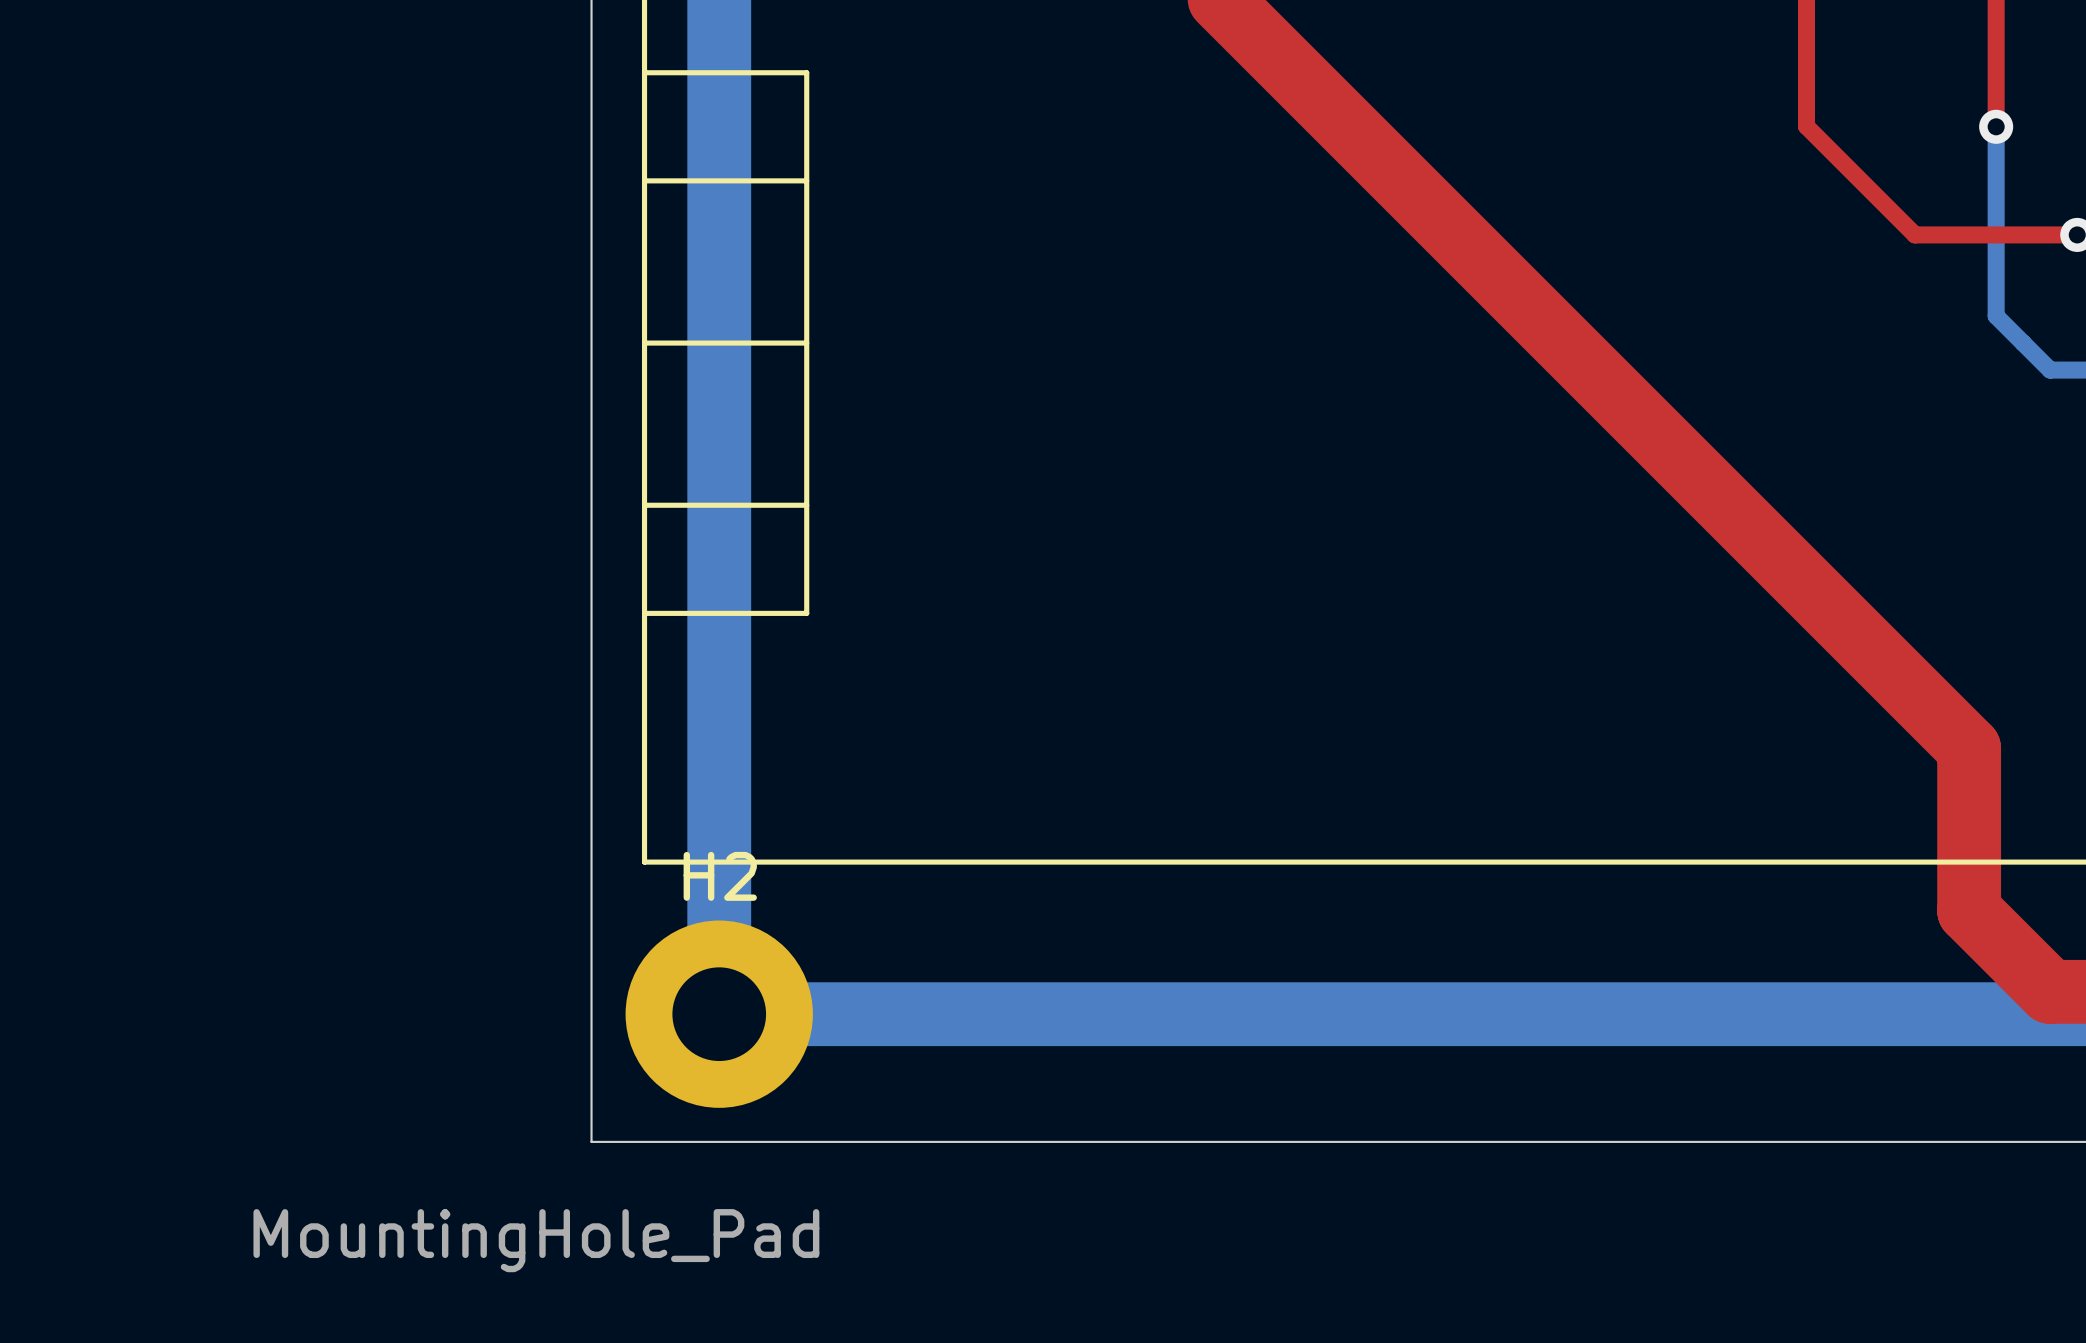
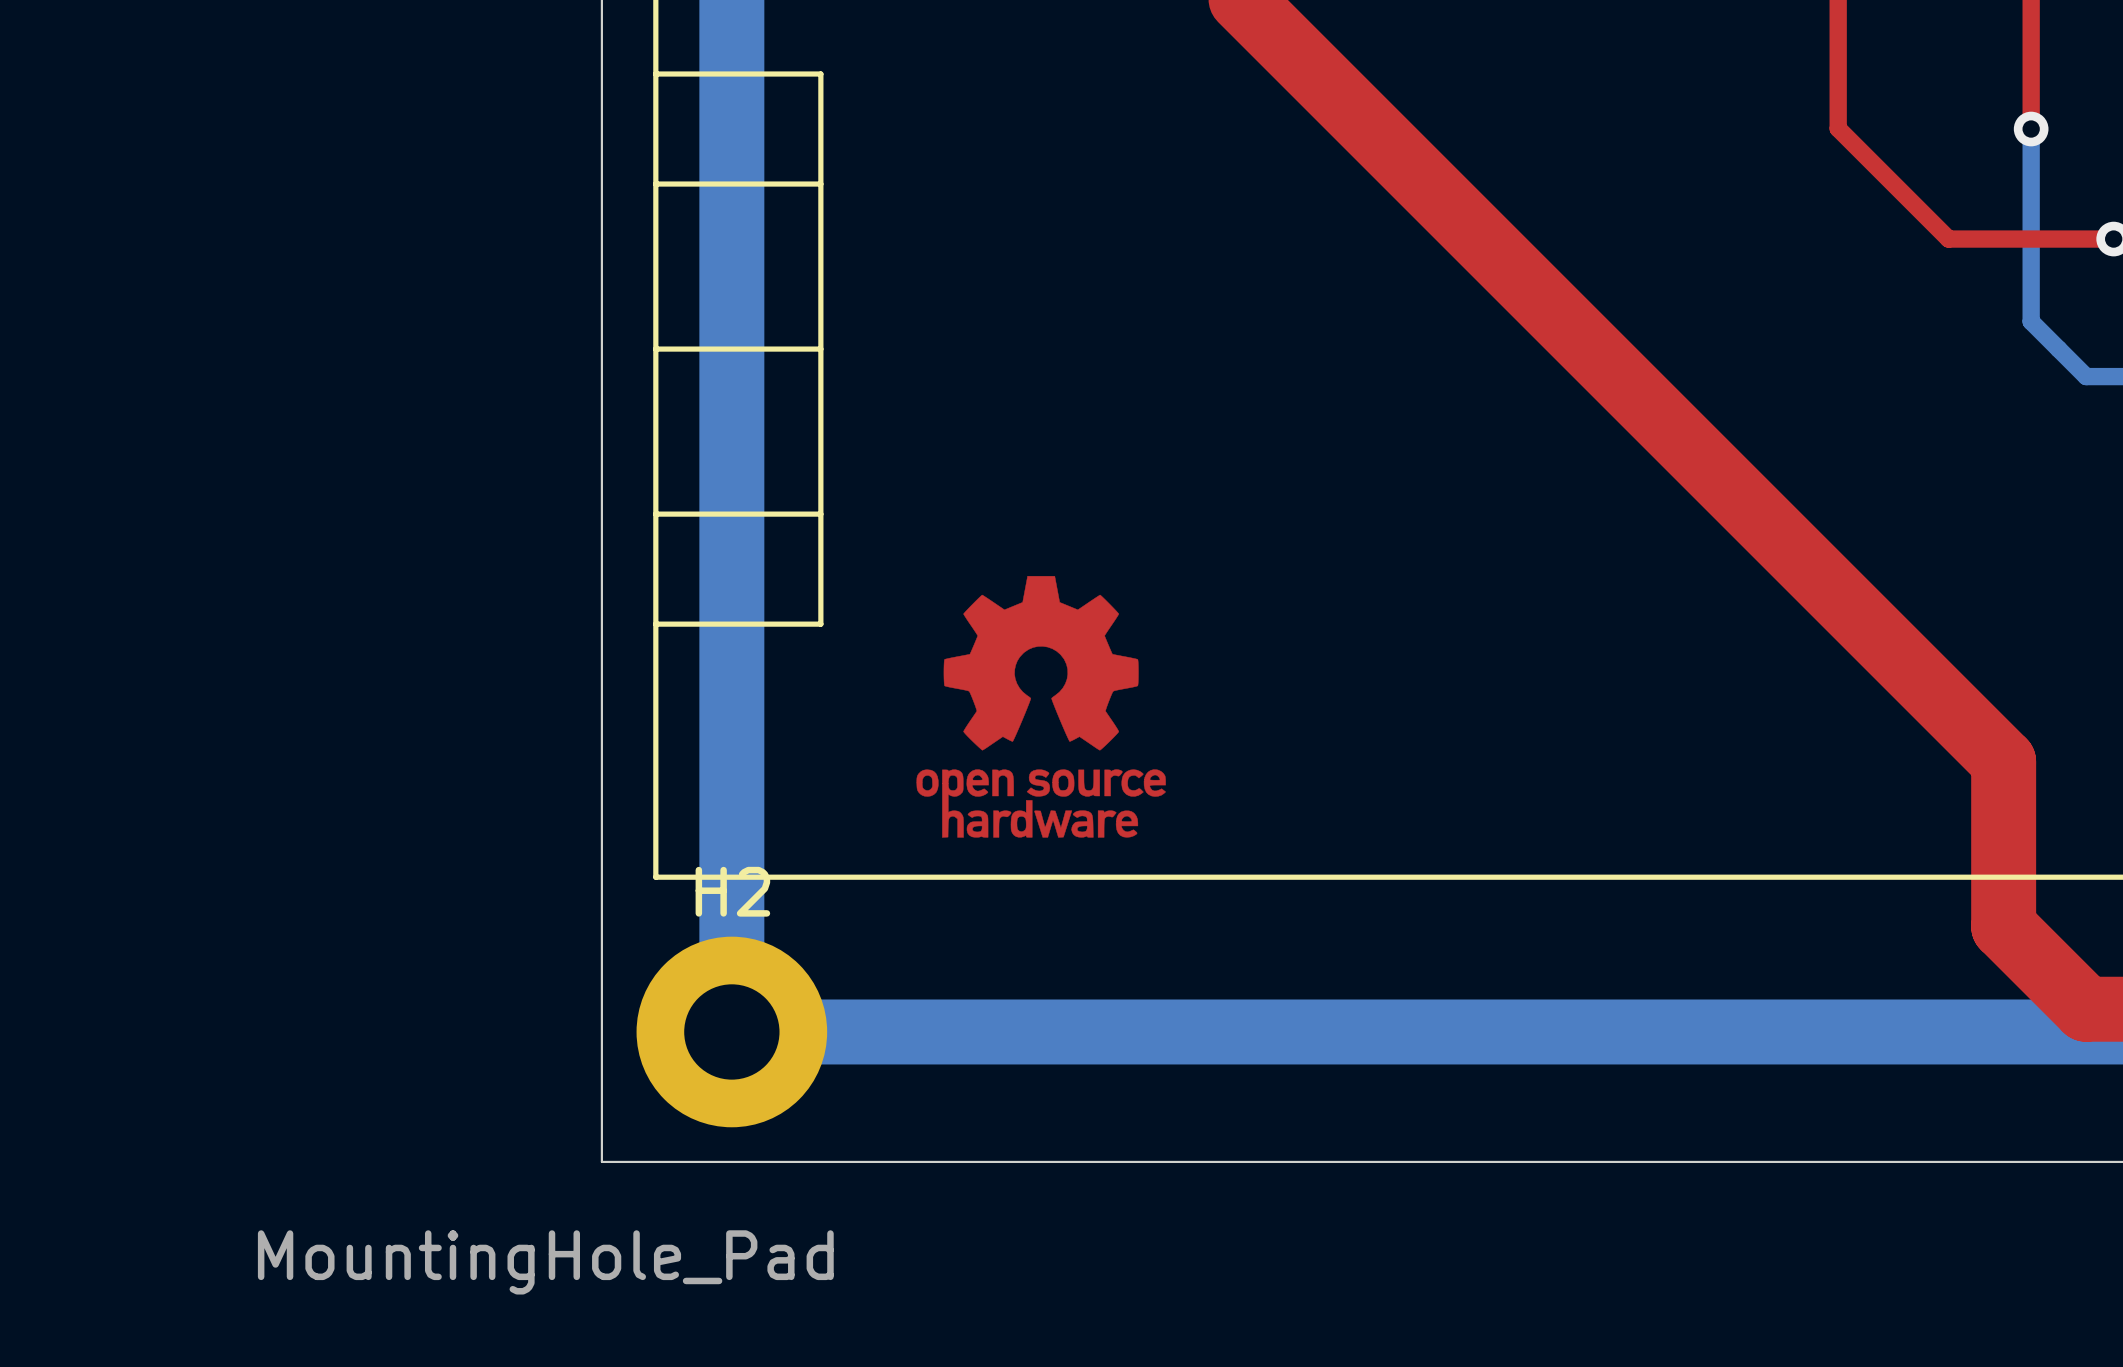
drawing: none -> [916, 576, 1166, 838]

